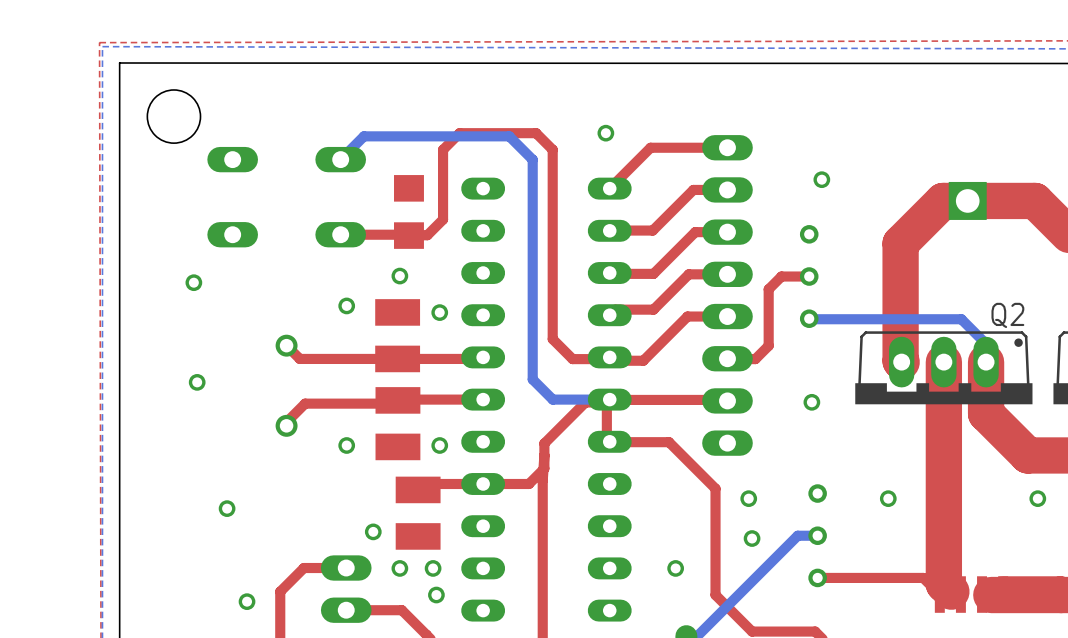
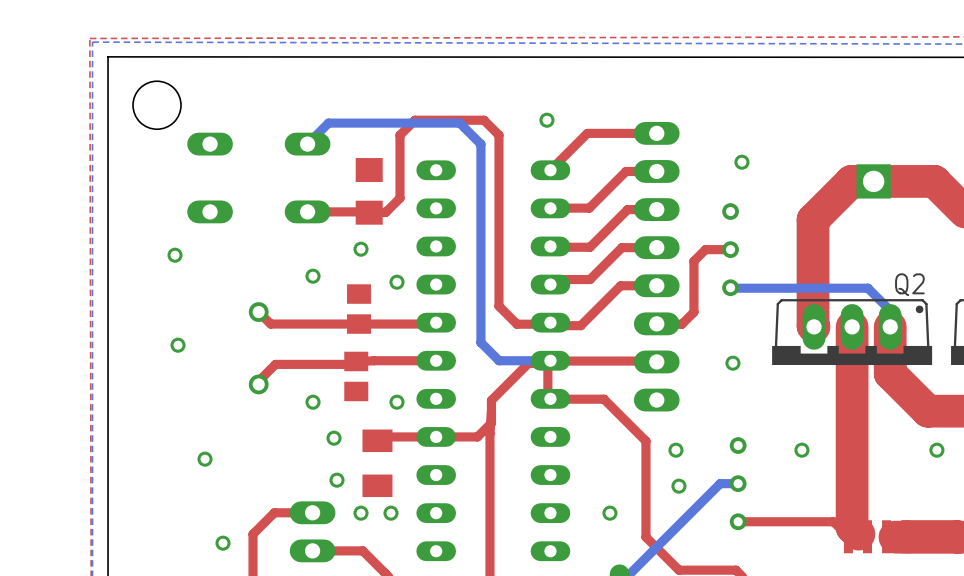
part footprint: [375, 299, 421, 373] -> [346, 284, 371, 334]
part footprint: [375, 387, 421, 461] -> [344, 351, 369, 402]
part footprint: [395, 476, 441, 550] -> [362, 429, 393, 498]
via: none -> (334, 438)
via: (436, 595) -> none

